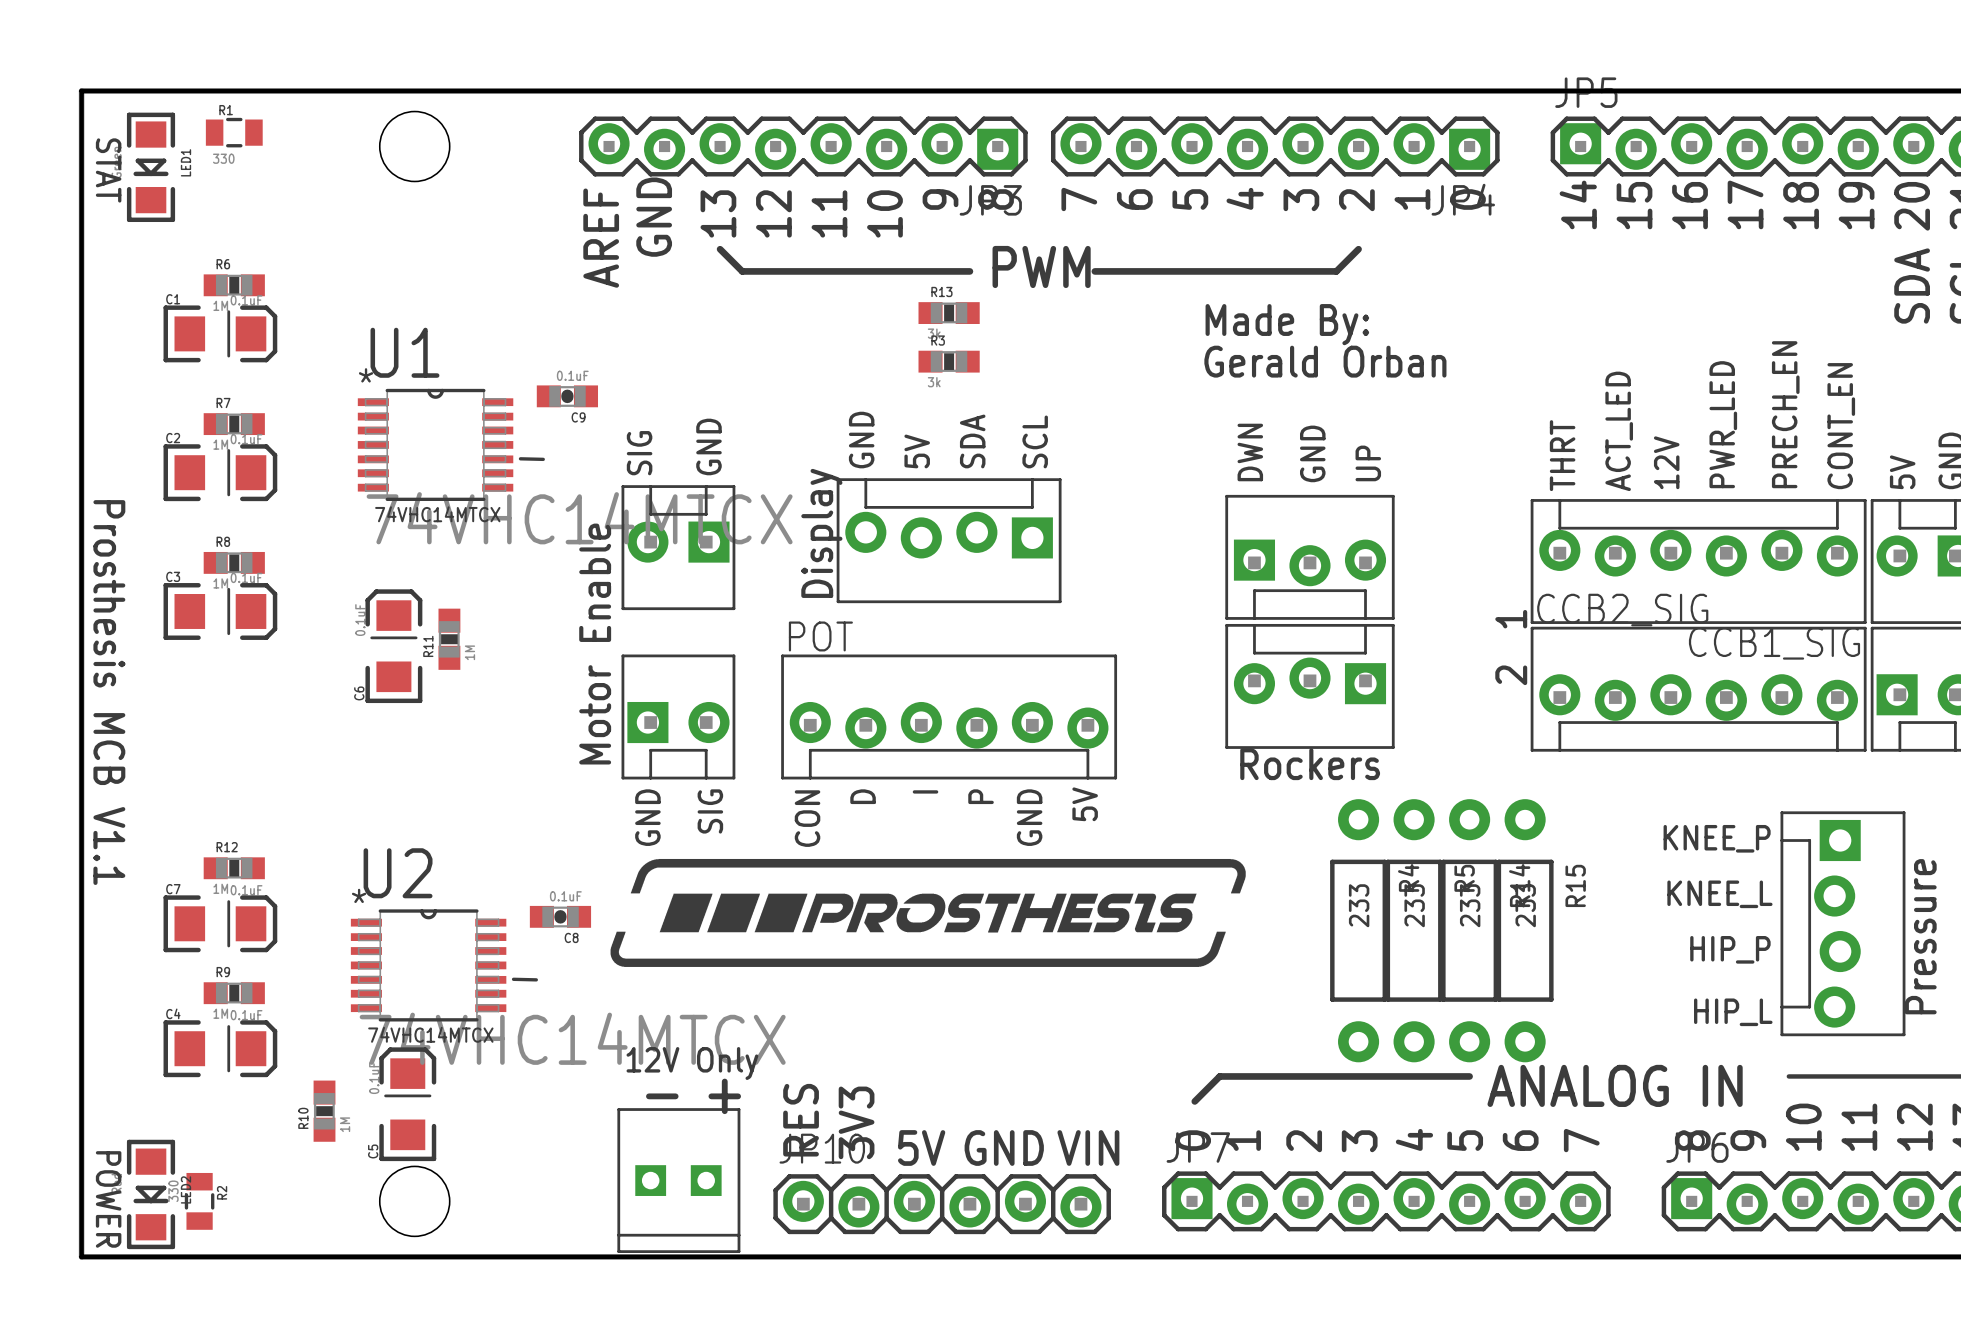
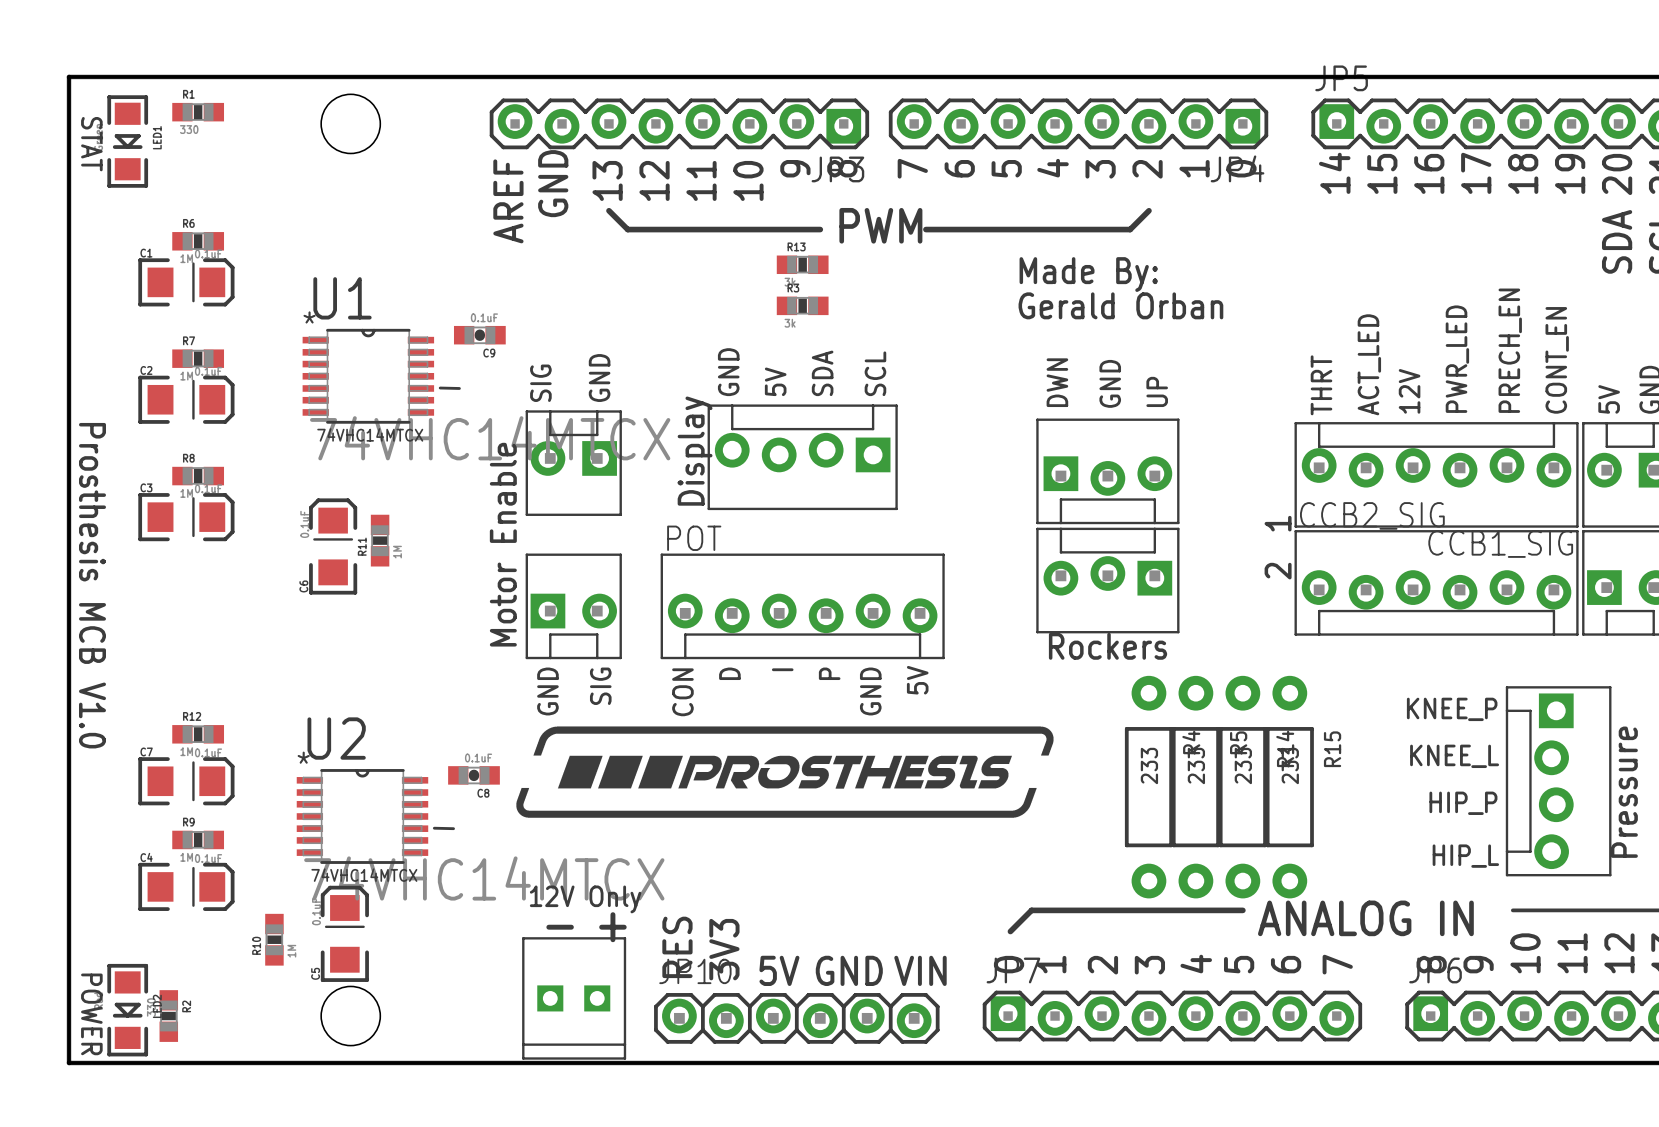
R1 footprint: [205, 117, 263, 148] -> [172, 102, 225, 122]
text: Prosthesis MCB V1.1 (109, 692) -> Prosthesis MCB V1.0 (92, 585)
R2 footprint: [184, 1172, 215, 1230] -> [159, 990, 179, 1042]

